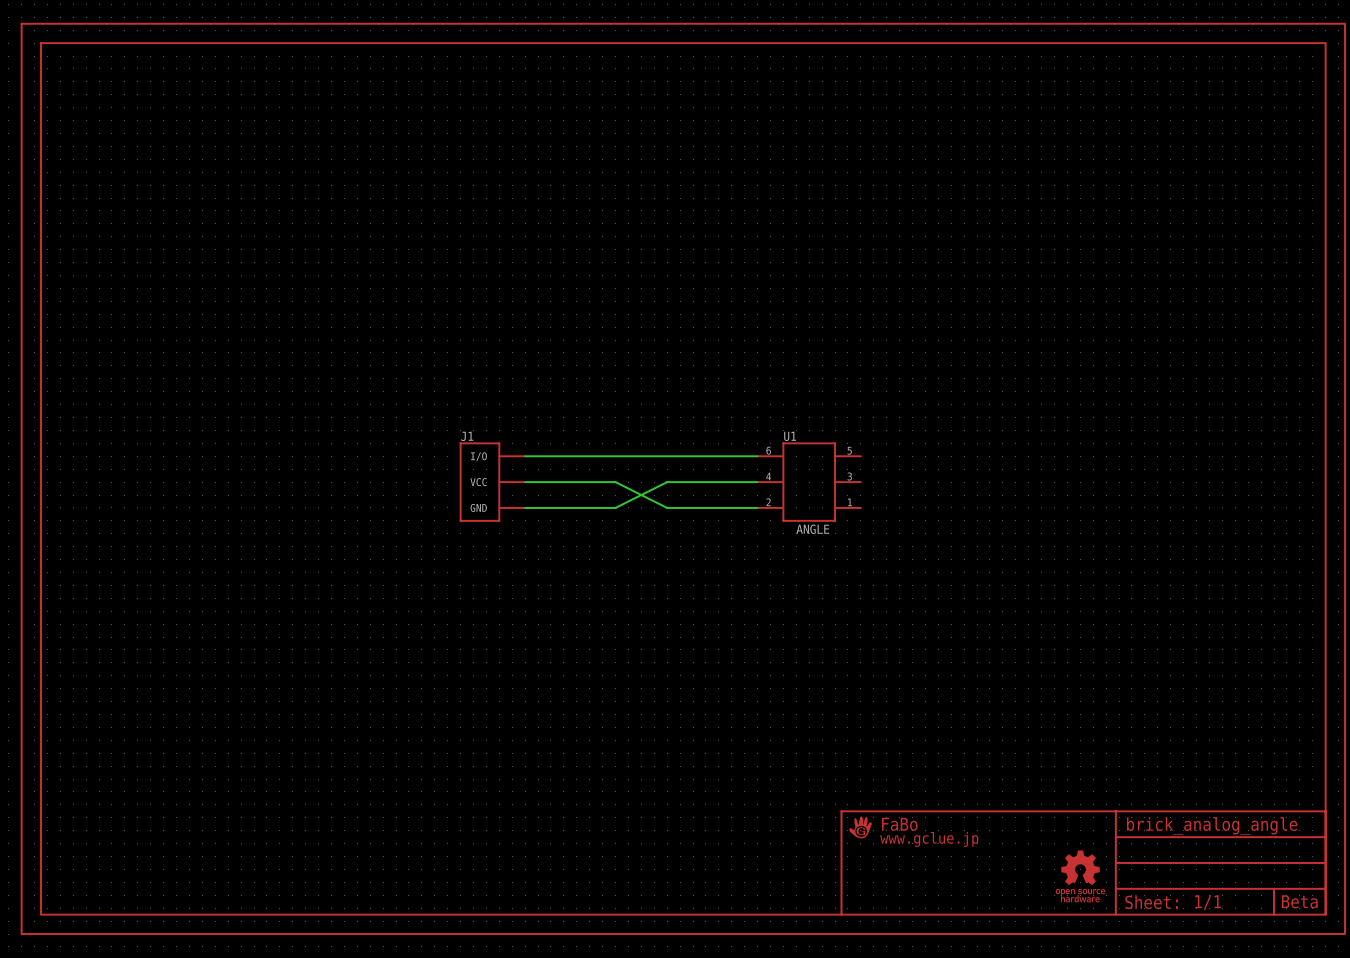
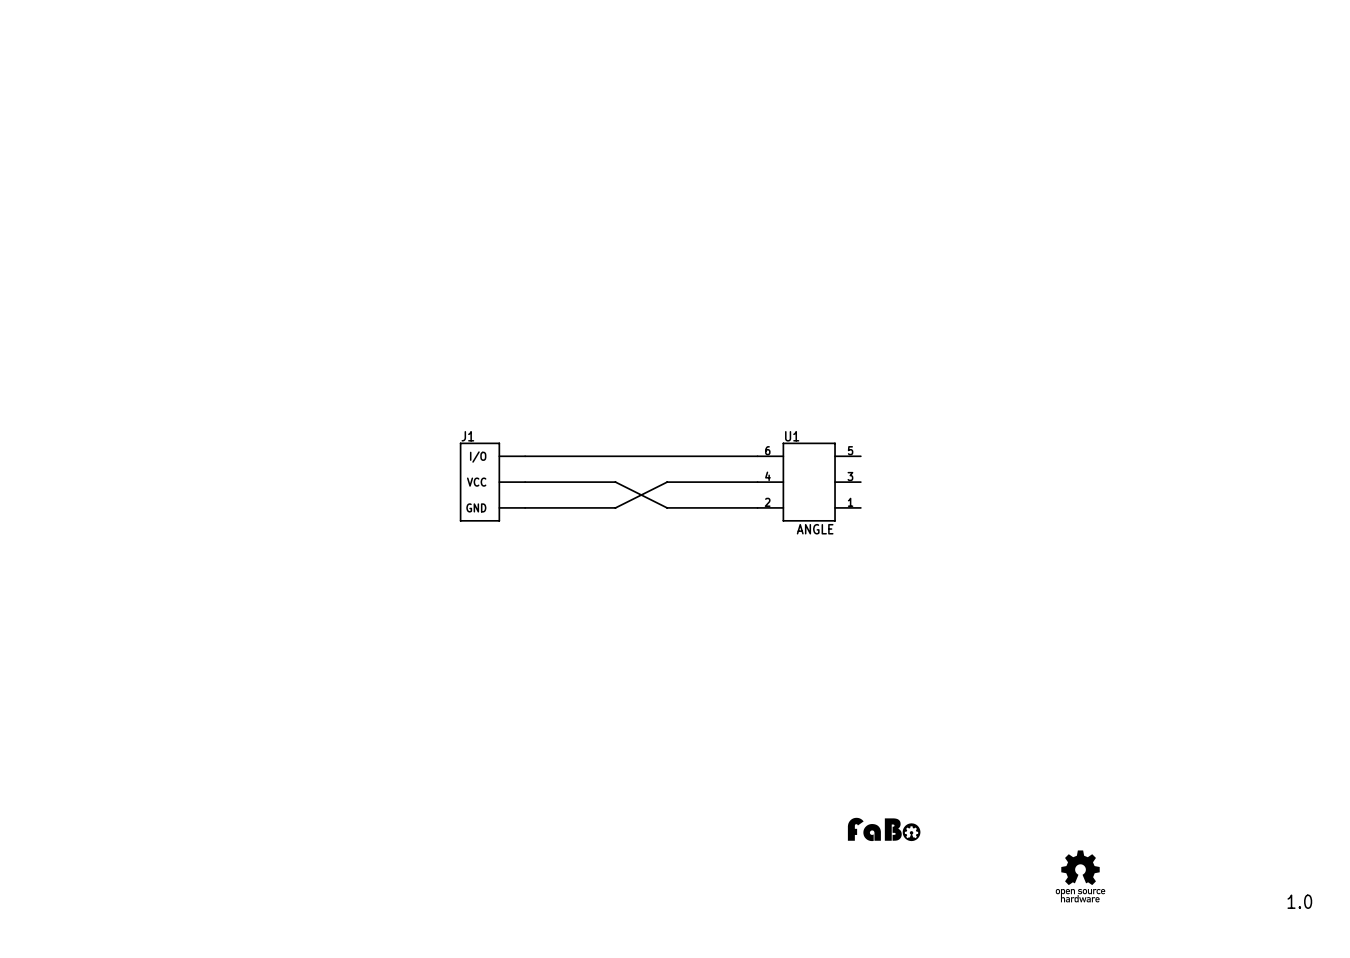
part: (683, 478) -> none
part: none -> (884, 829)
text: Beta (1299, 901) -> 1.0 (1299, 901)

